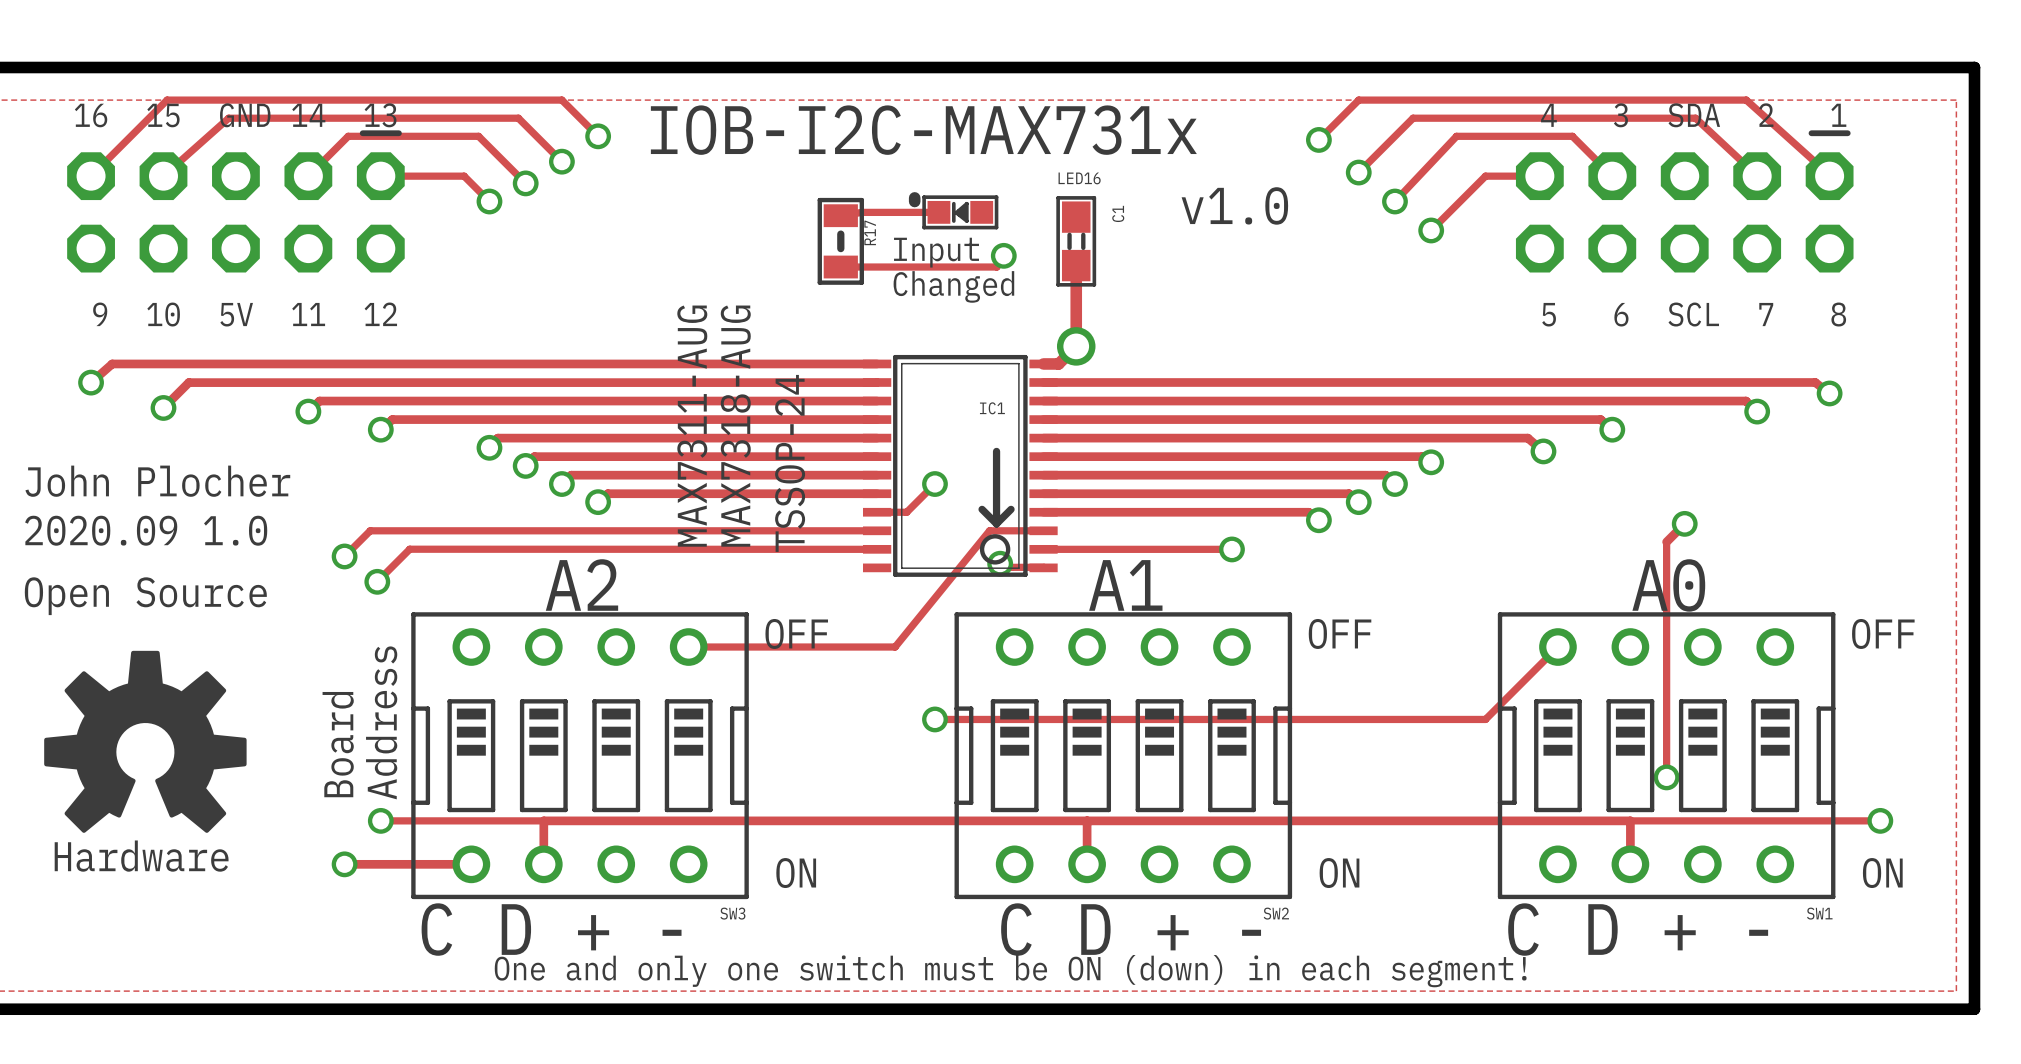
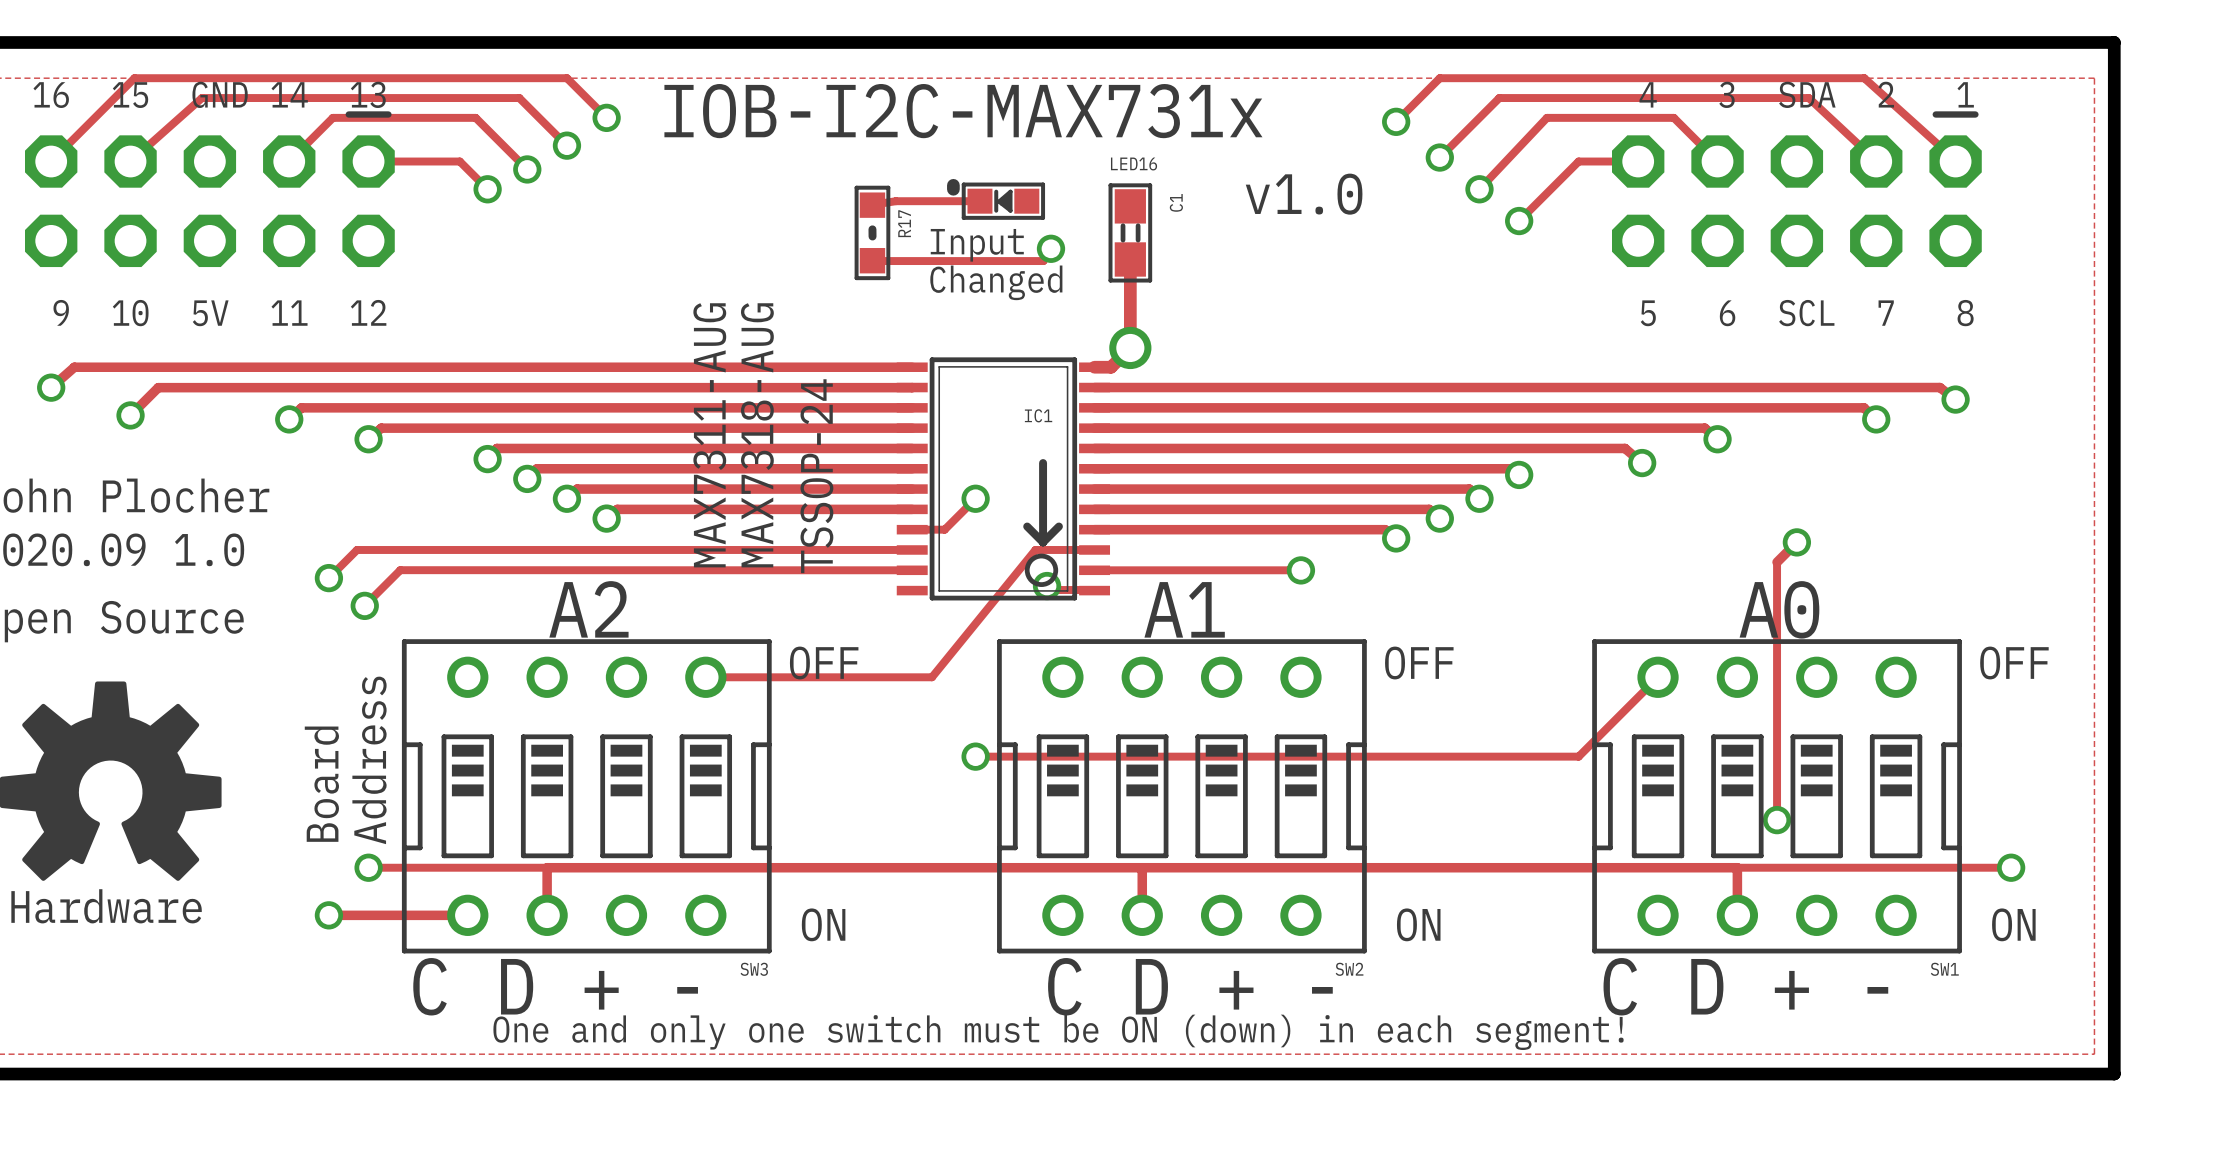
R17 footprint: [817, 197, 864, 285] -> [854, 185, 891, 281]

